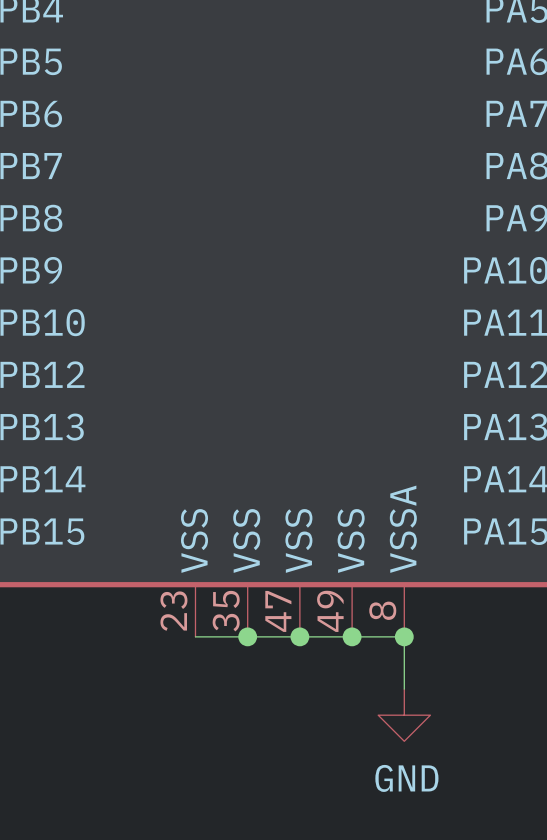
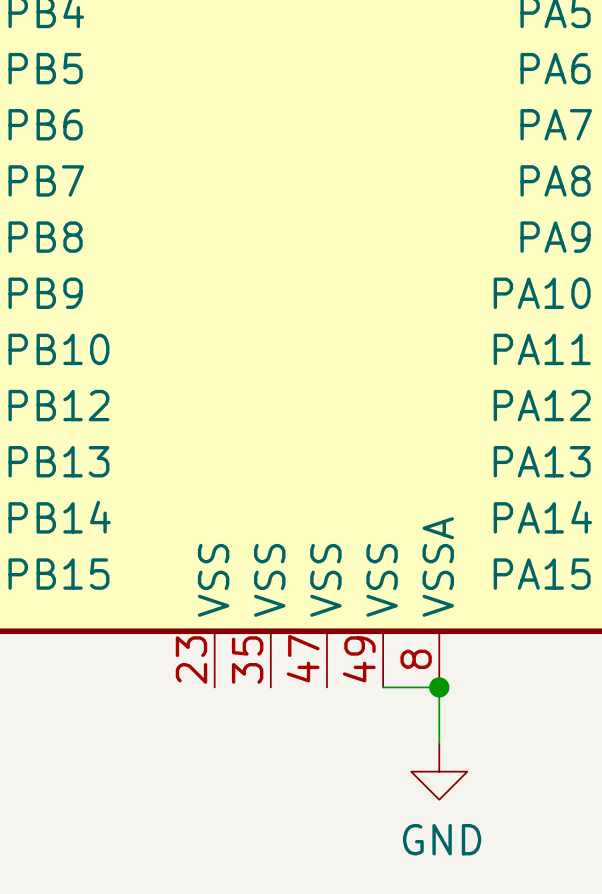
wire: (195, 636) (352, 636) -> none
junction: (247, 636) -> none
junction: (299, 636) -> none
junction: (352, 636) -> none

